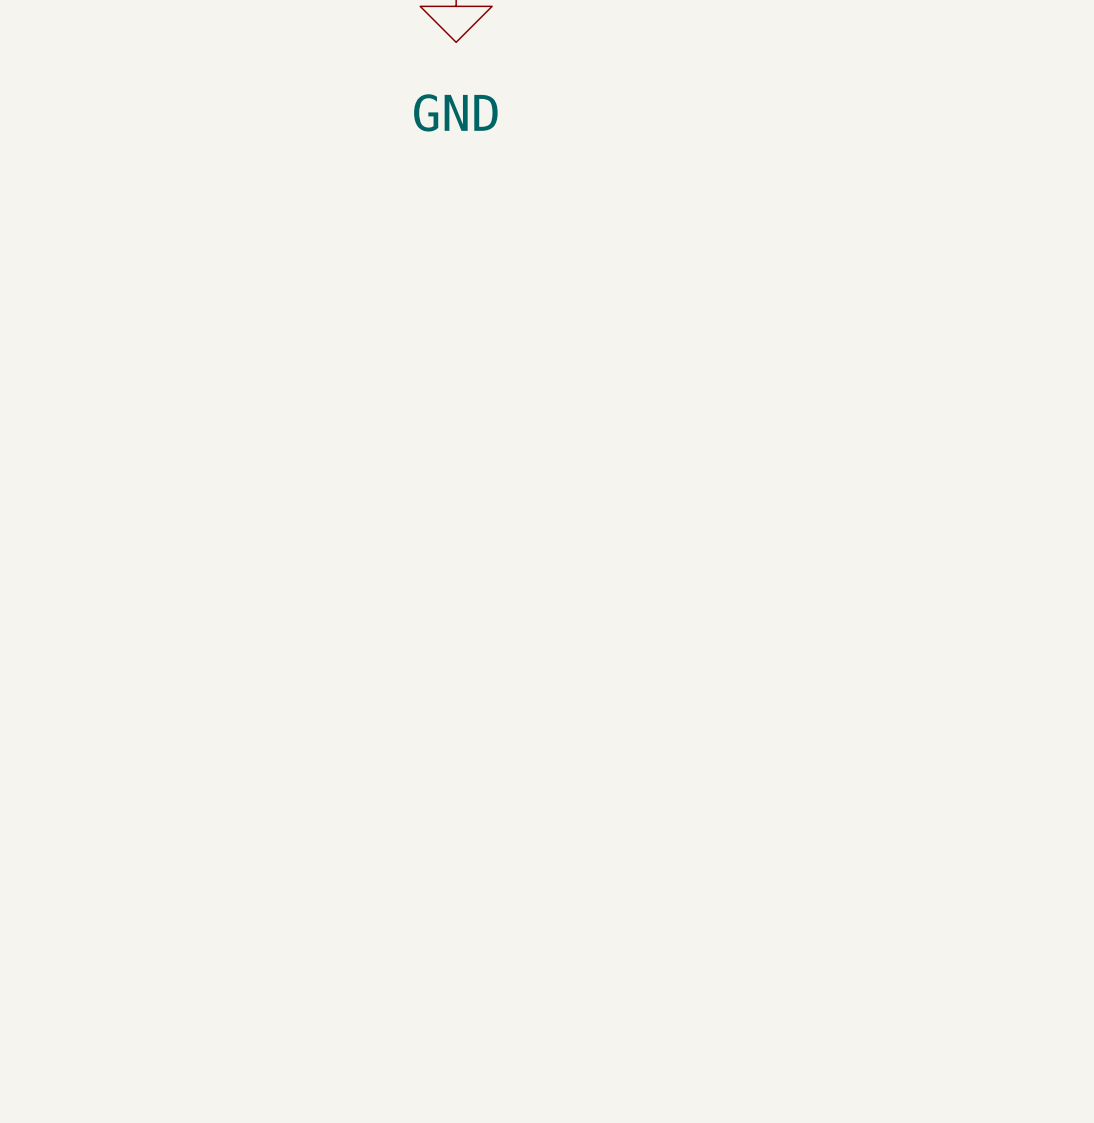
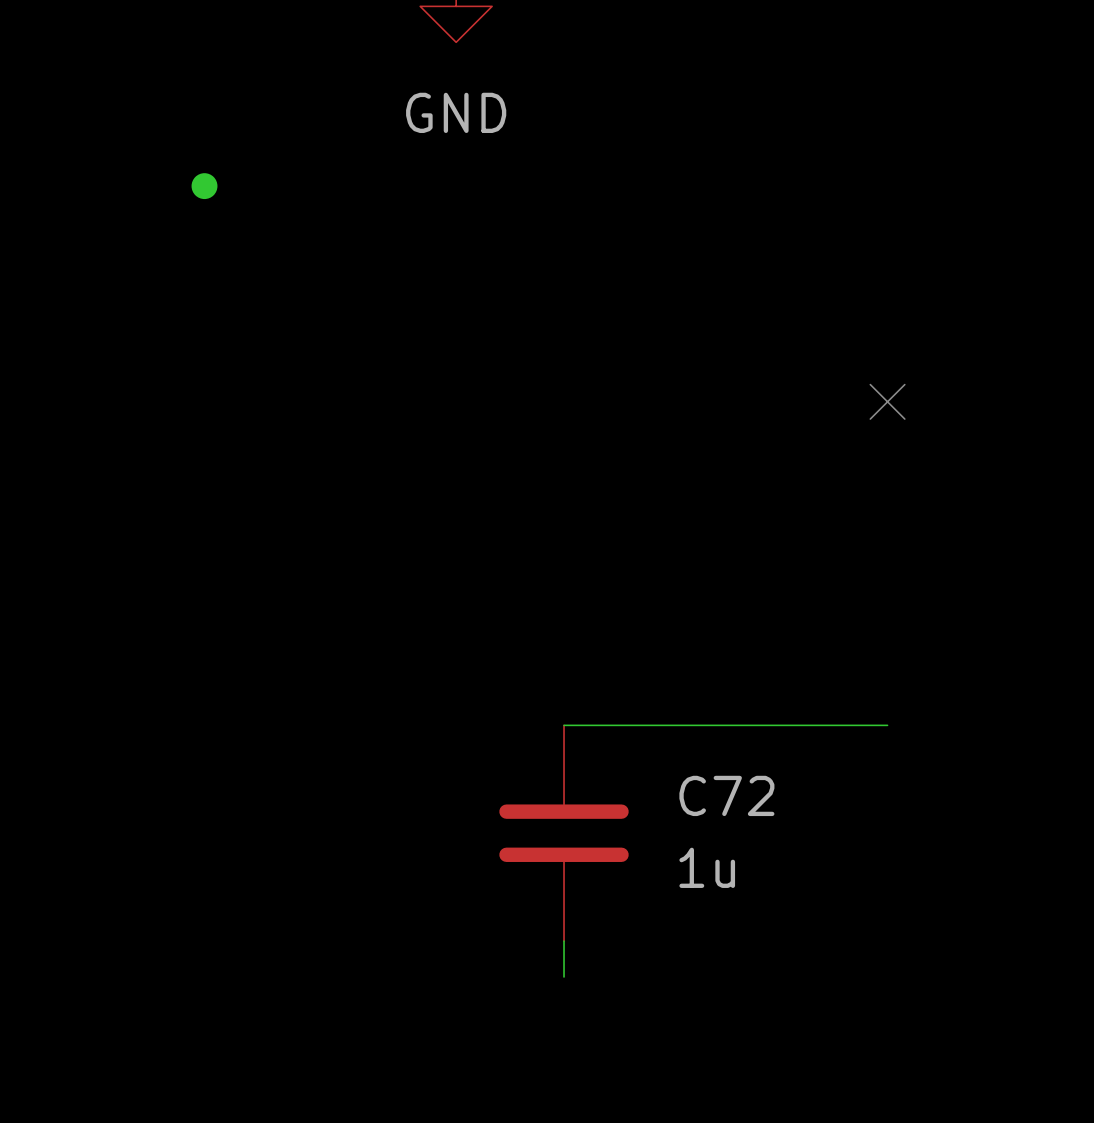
junction: none -> (204, 186)
no-connect mark: none -> (887, 401)
wire: none -> (564, 725) (887, 725)
C72: none -> 1u (564, 833)
wire: none -> (564, 941) (564, 977)

